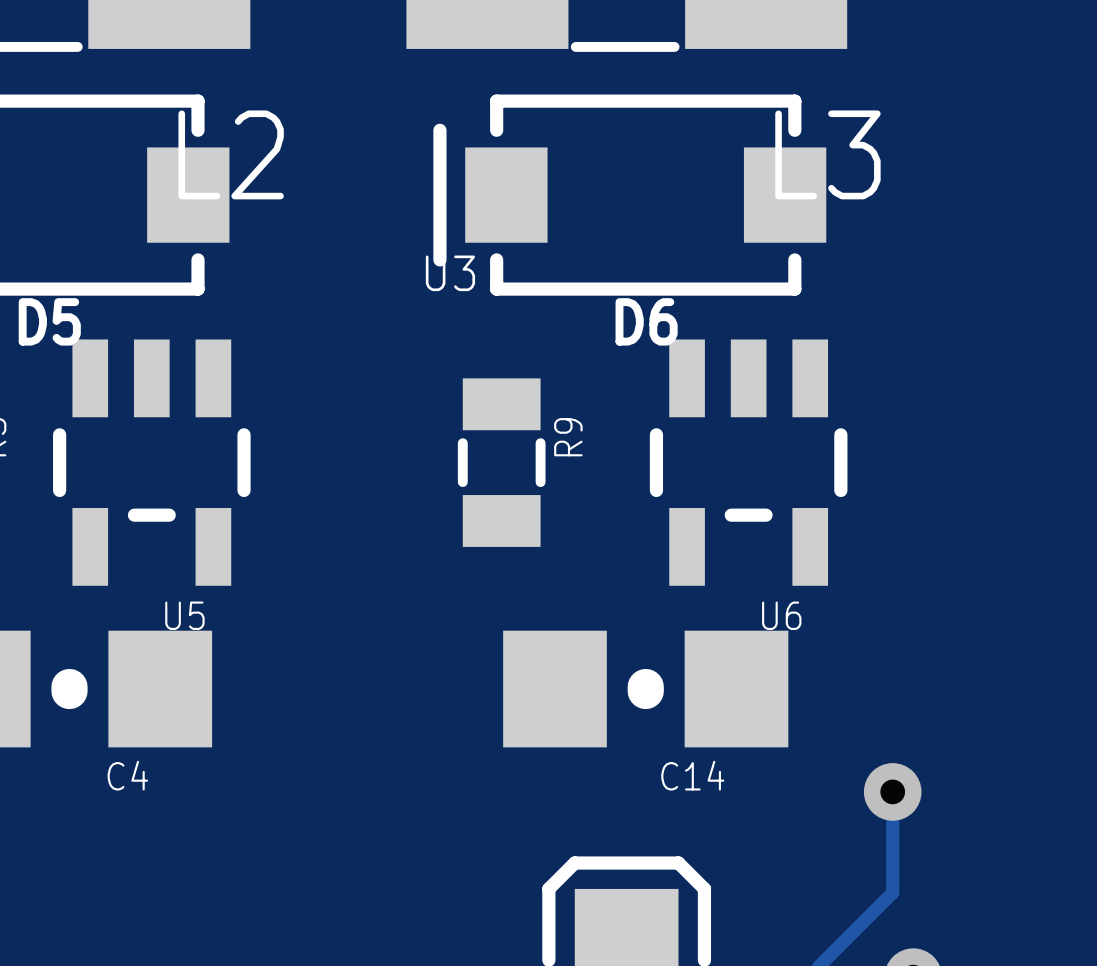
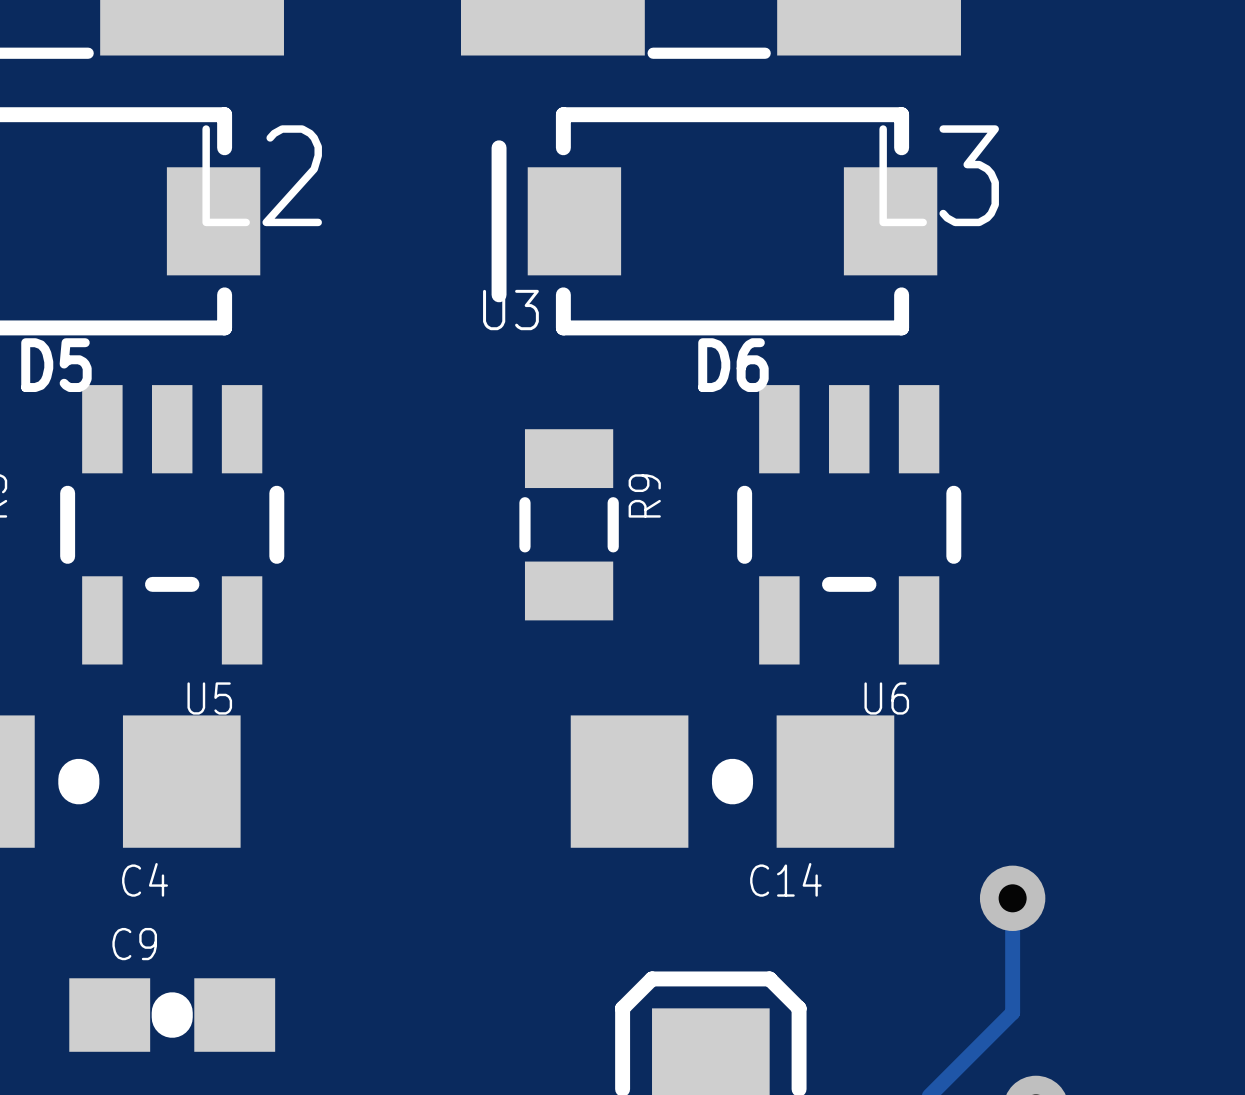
C9: none -> (172, 1015)

